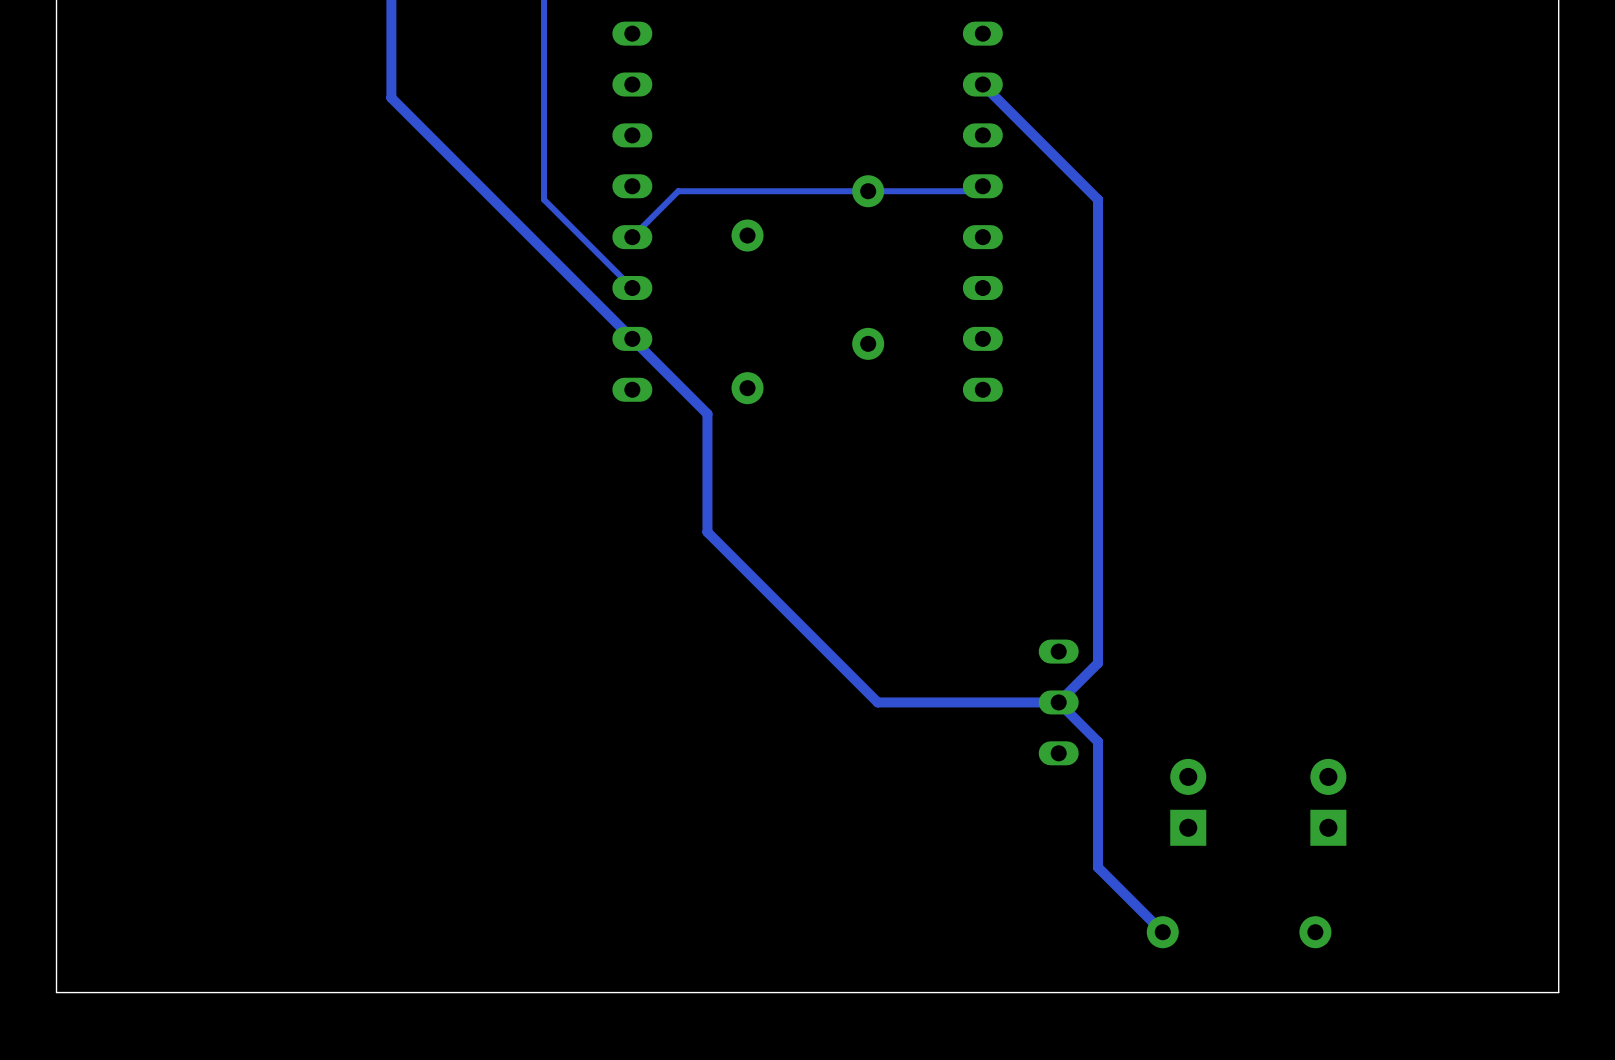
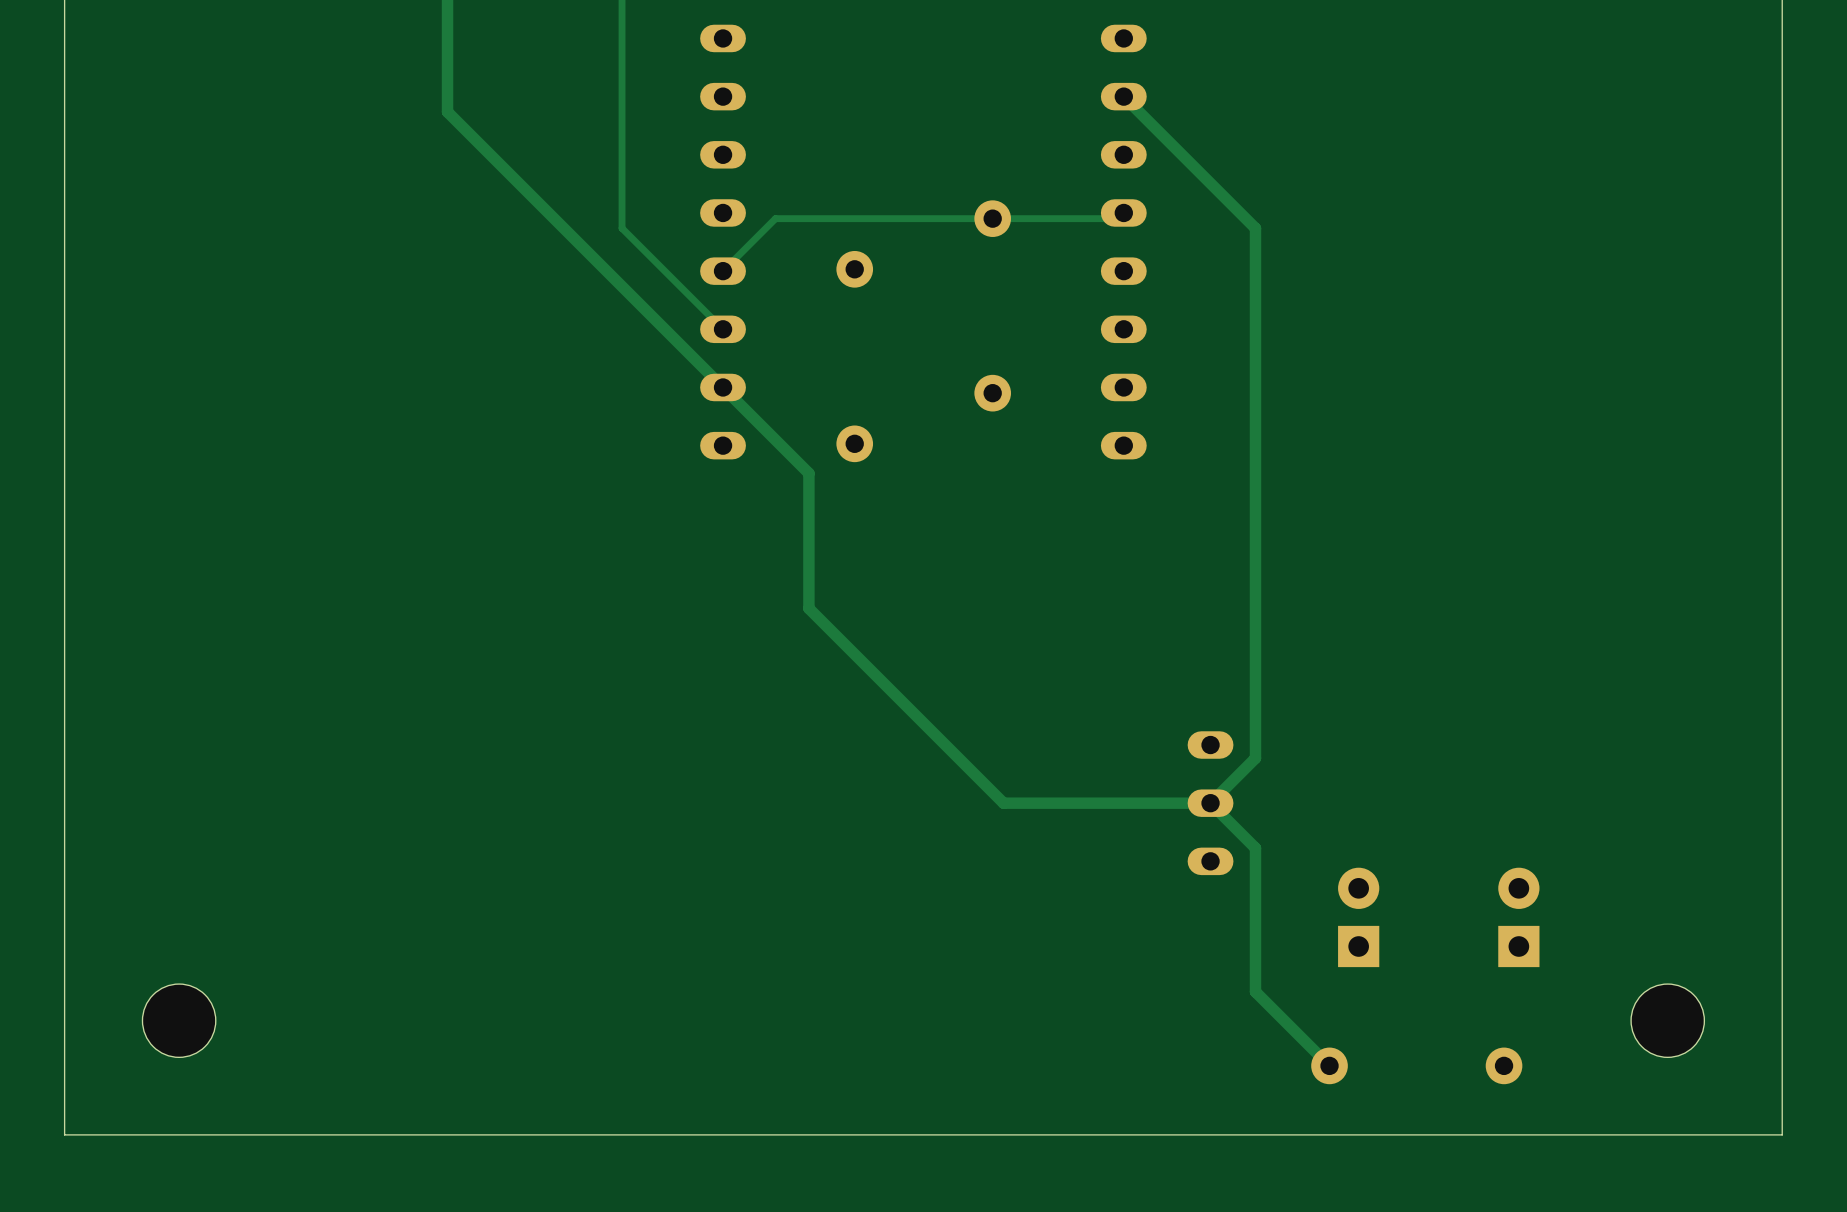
part: none -> (179, 1020)
part: none -> (1667, 1020)

